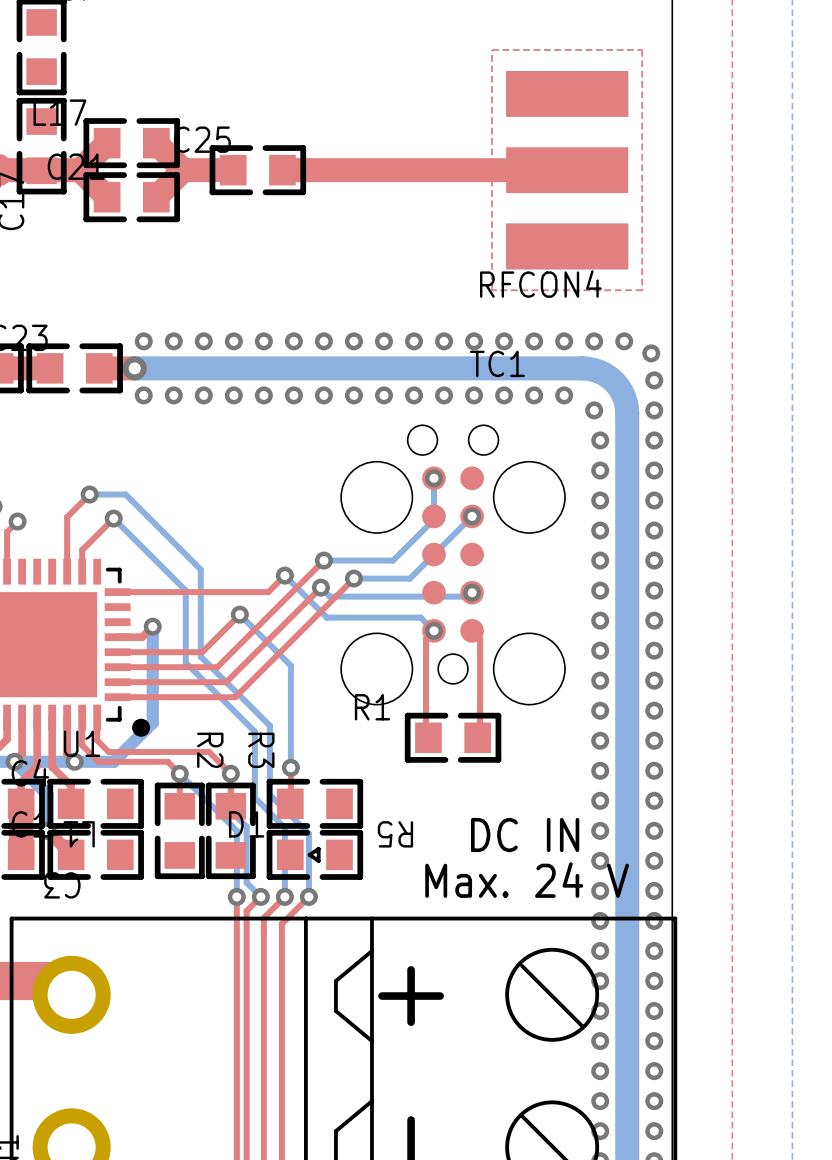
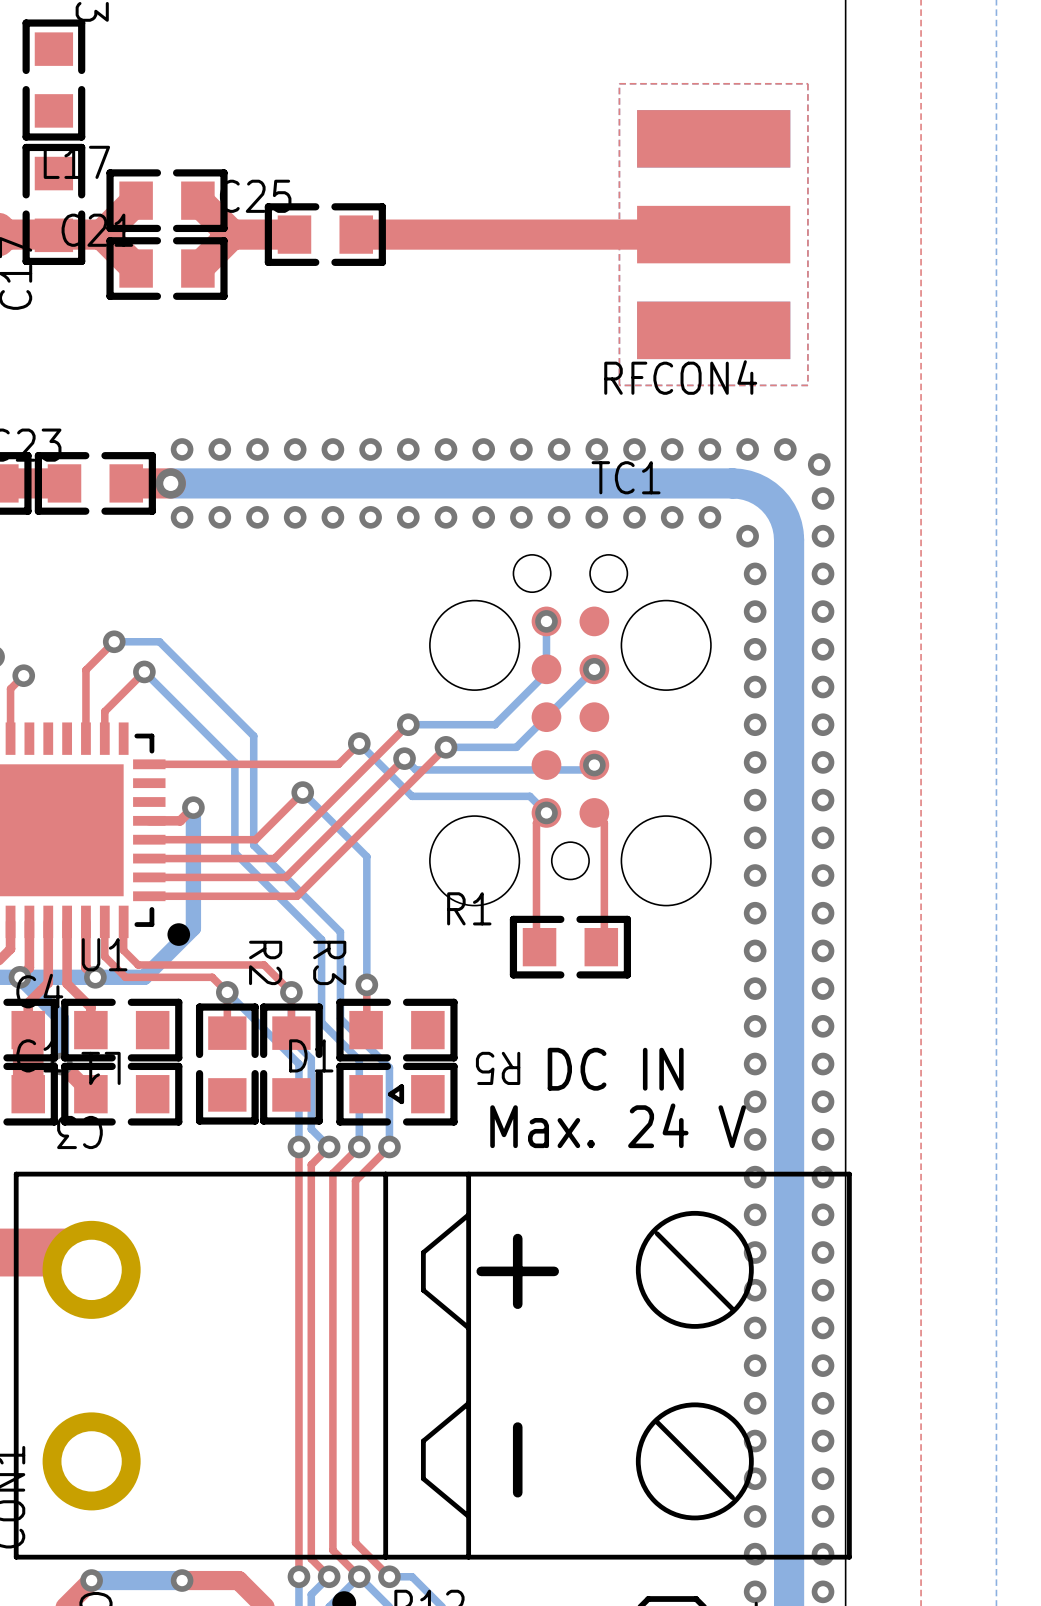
text position: DC IN (525, 835) -> DC IN (615, 1069)
text position: Max. 24 V (527, 880) -> Max. 24 V (618, 1125)

